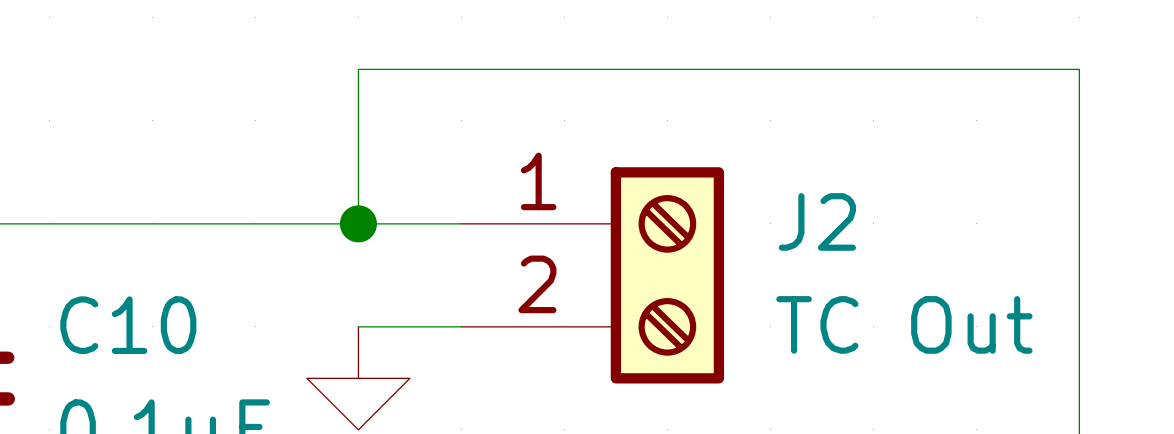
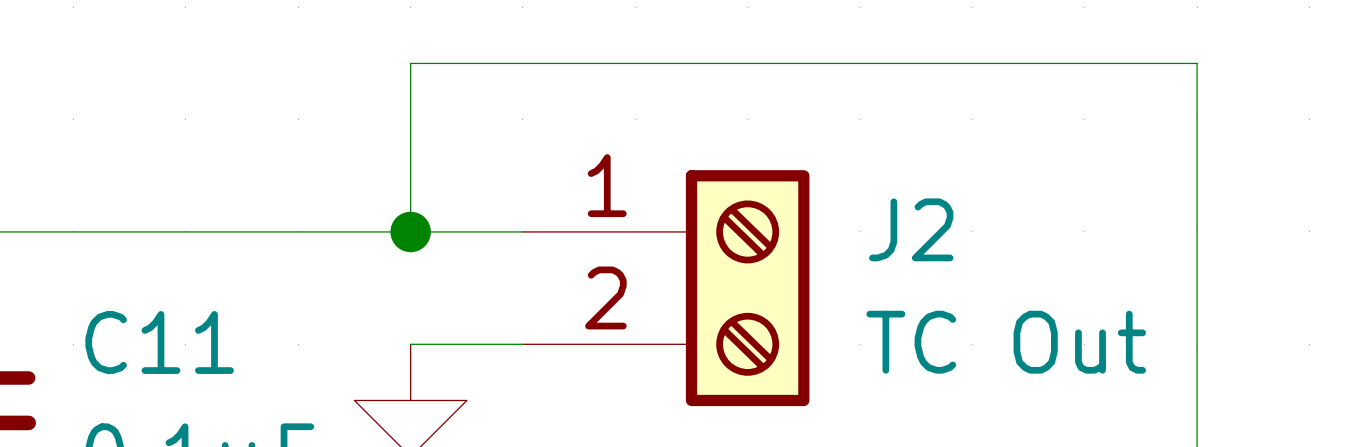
C10 name: C10 (128, 325) -> C11 (159, 342)

